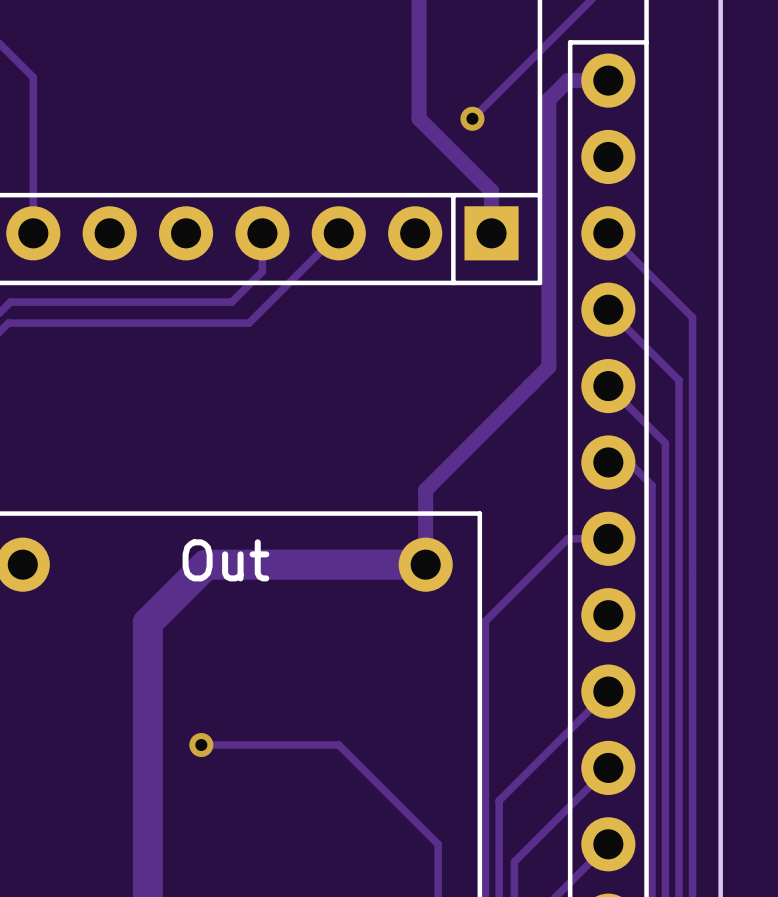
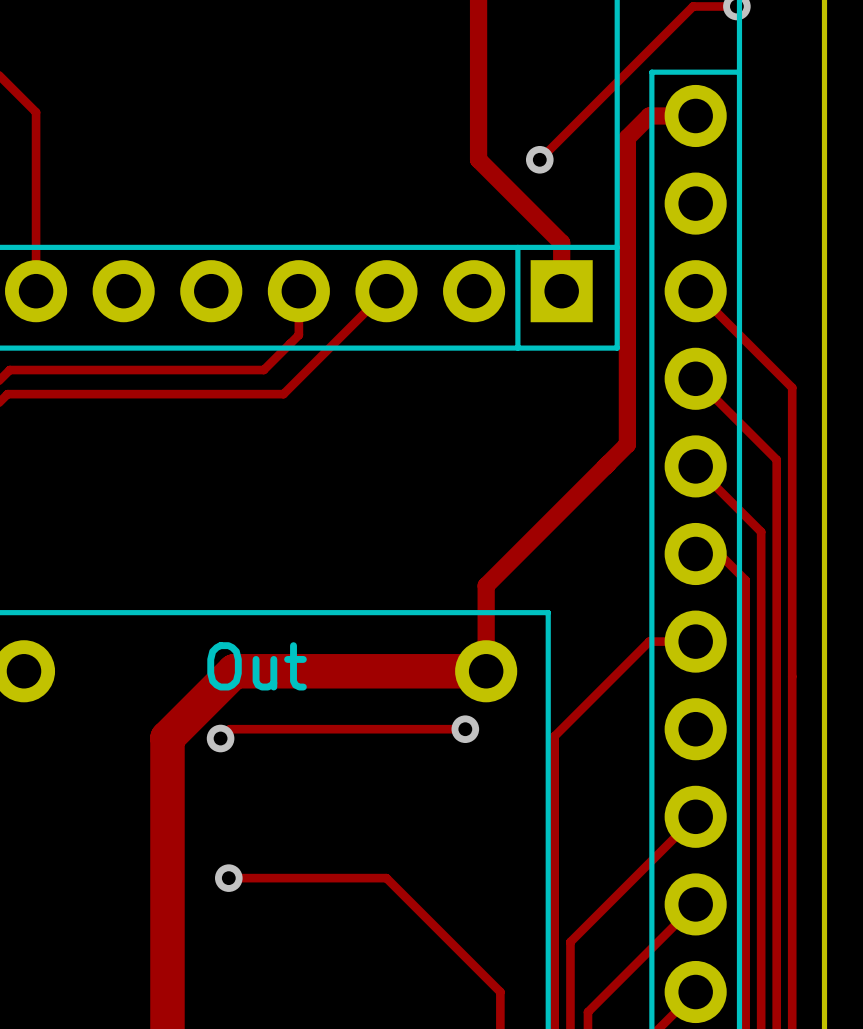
track: none -> (465, 729) (229, 729) (220, 738)
via: none -> (465, 729)
via: none -> (220, 738)

